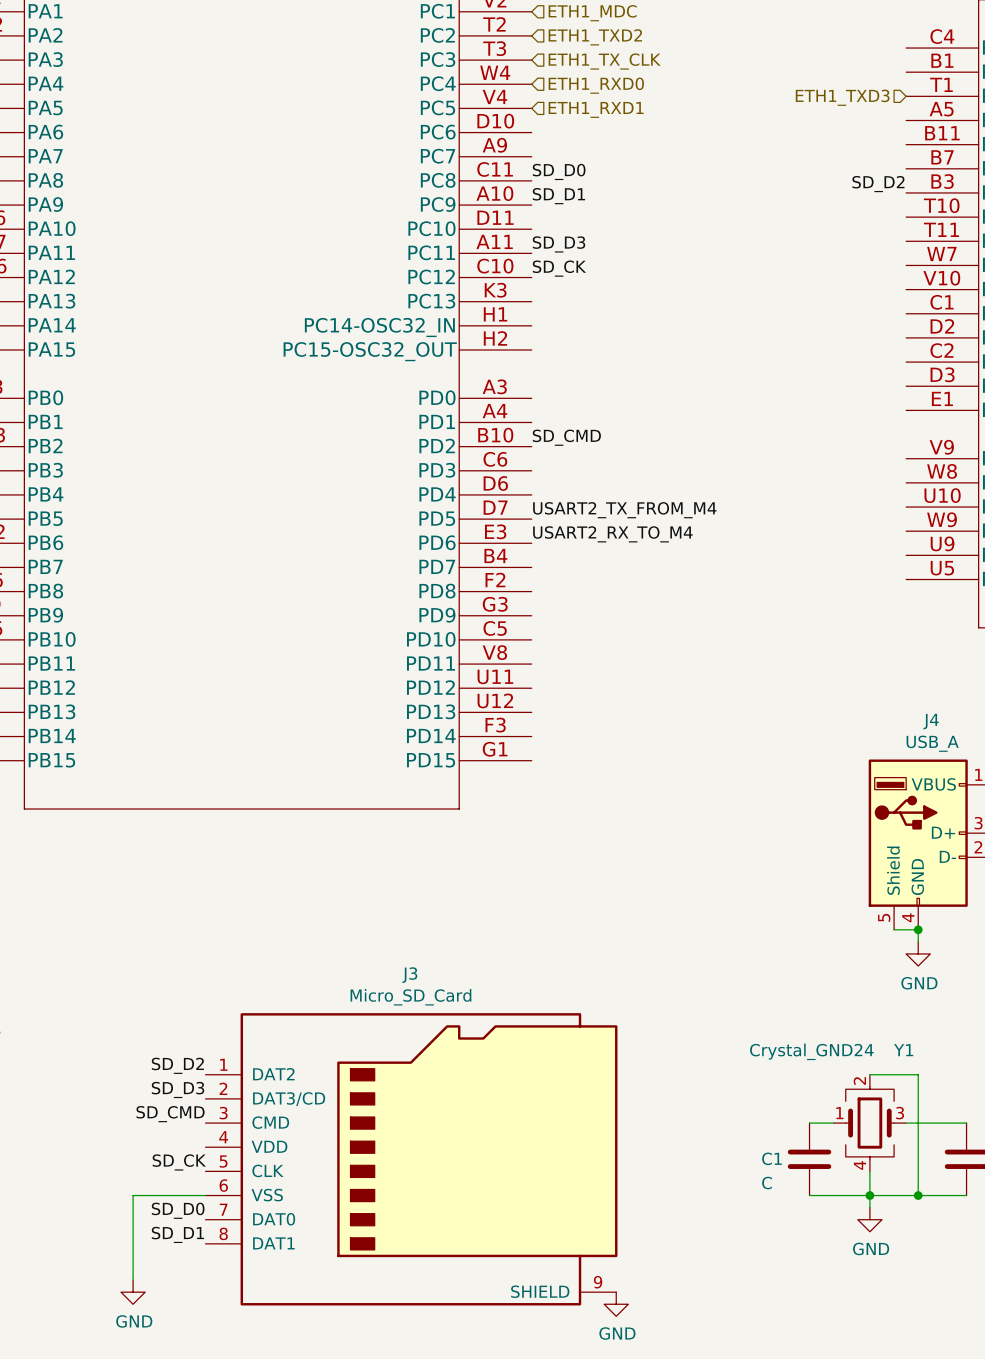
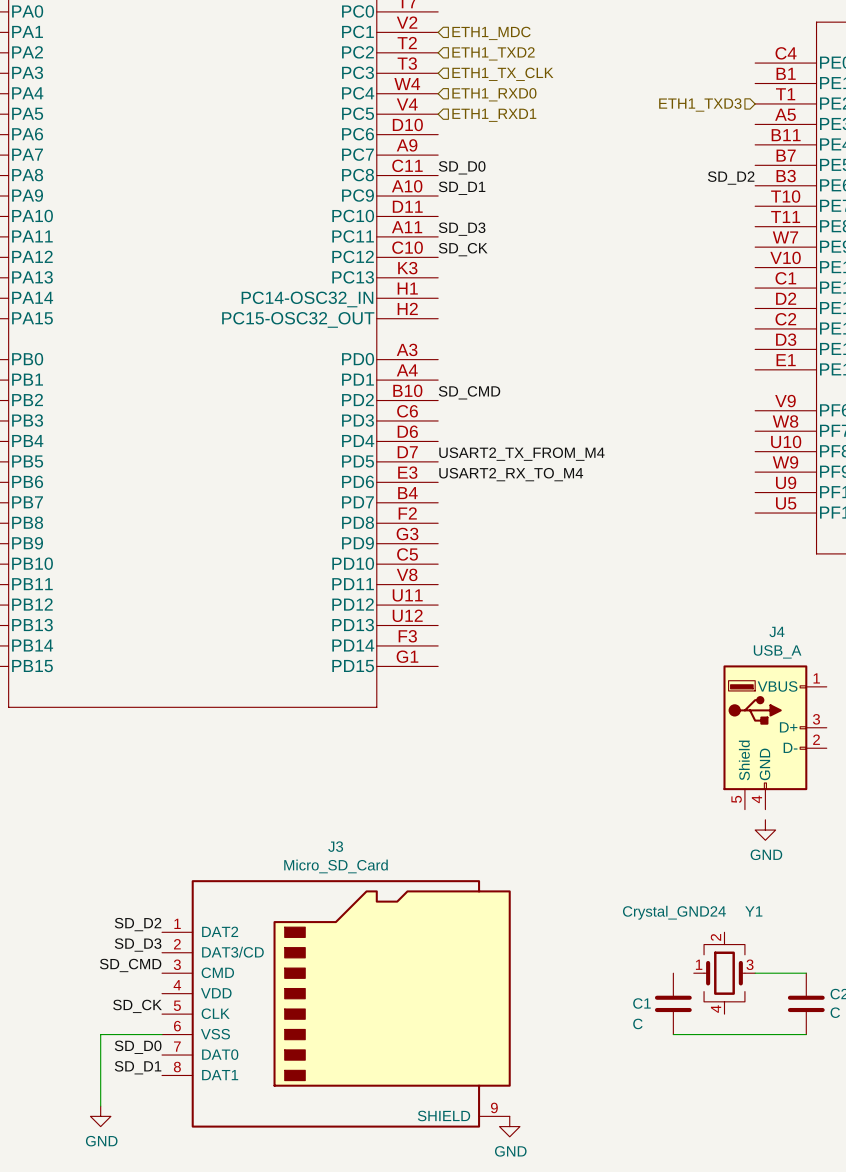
wire: (894, 929) (918, 929) (918, 941) -> none
junction: (918, 929) -> none
wire: (869, 1074) (918, 1074) (918, 1195) -> none
wire: (809, 1123) (833, 1123) -> none
wire: (869, 1171) (869, 1207) -> none
junction: (869, 1195) -> none
junction: (918, 1195) -> none
power symbol: GND (869, 1219) -> none

